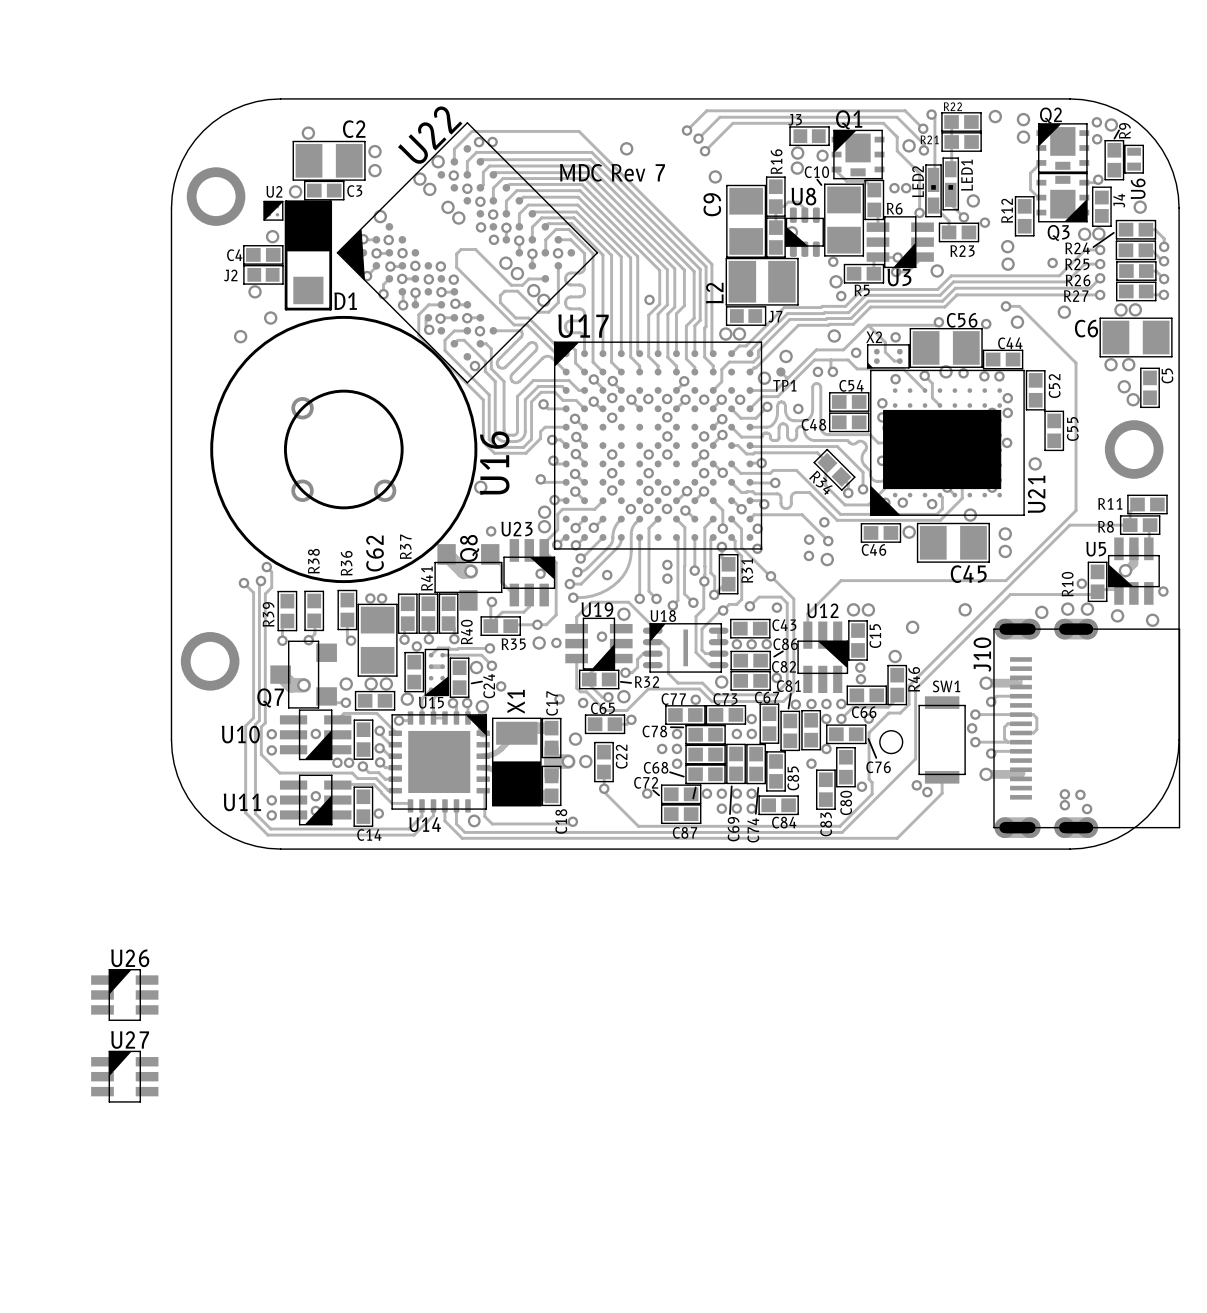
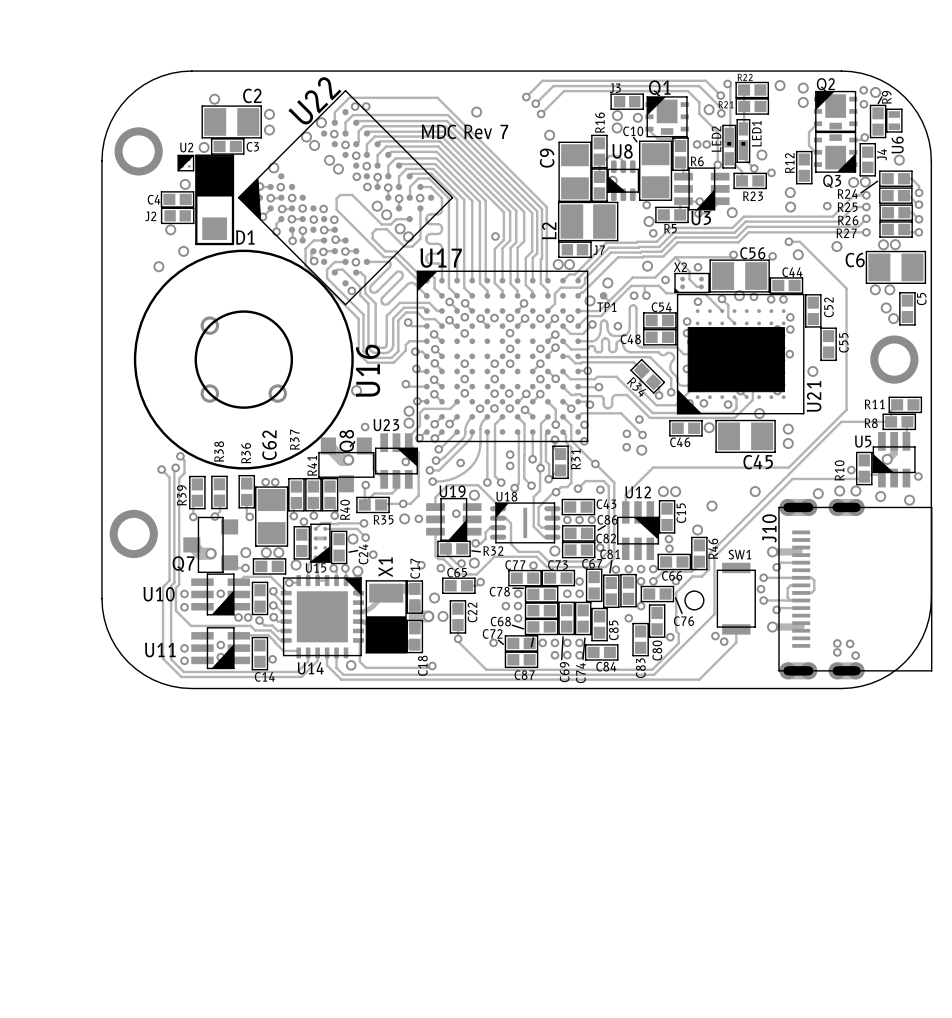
U26: (124, 994) -> none
U27: (124, 1076) -> none

